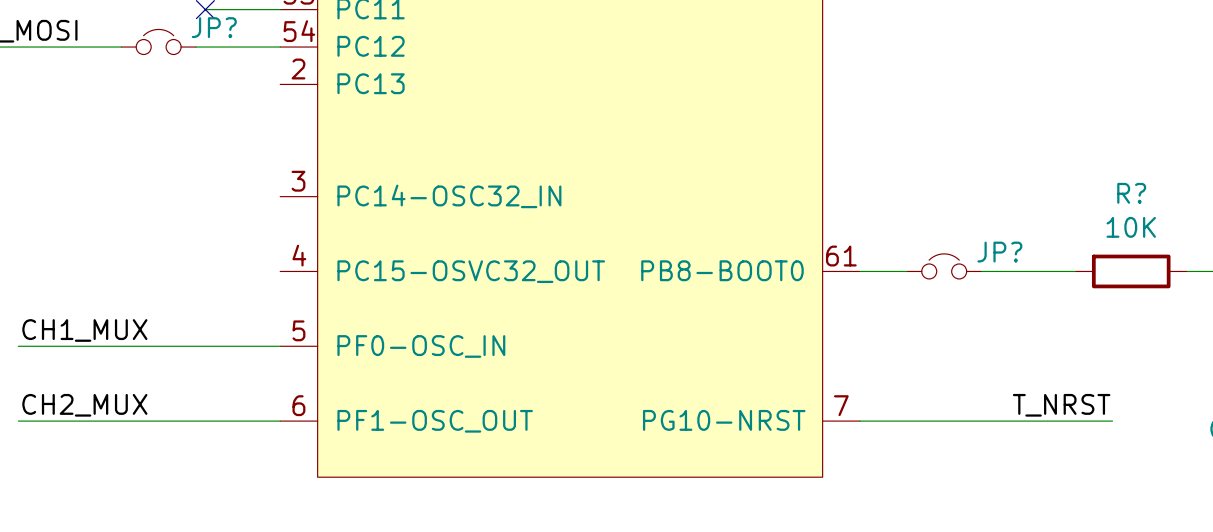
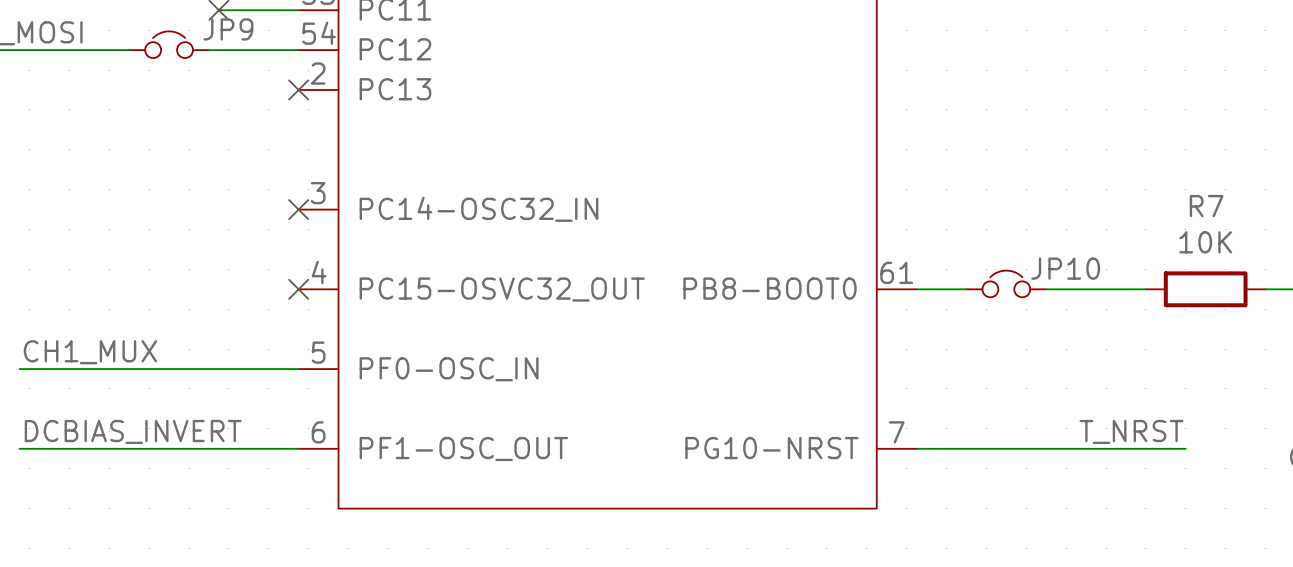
JP? name: JP? (214, 27) -> JP9 (228, 29)
no-connect mark: none -> (298, 89)
R? name: R? (1131, 193) -> R7 (1206, 206)
no-connect mark: none -> (298, 209)
JP? name: JP? (999, 252) -> JP10 (1065, 268)
no-connect mark: none -> (298, 289)
label: CH2_MUX (84, 405) -> DCBIAS_INVERT (133, 431)

